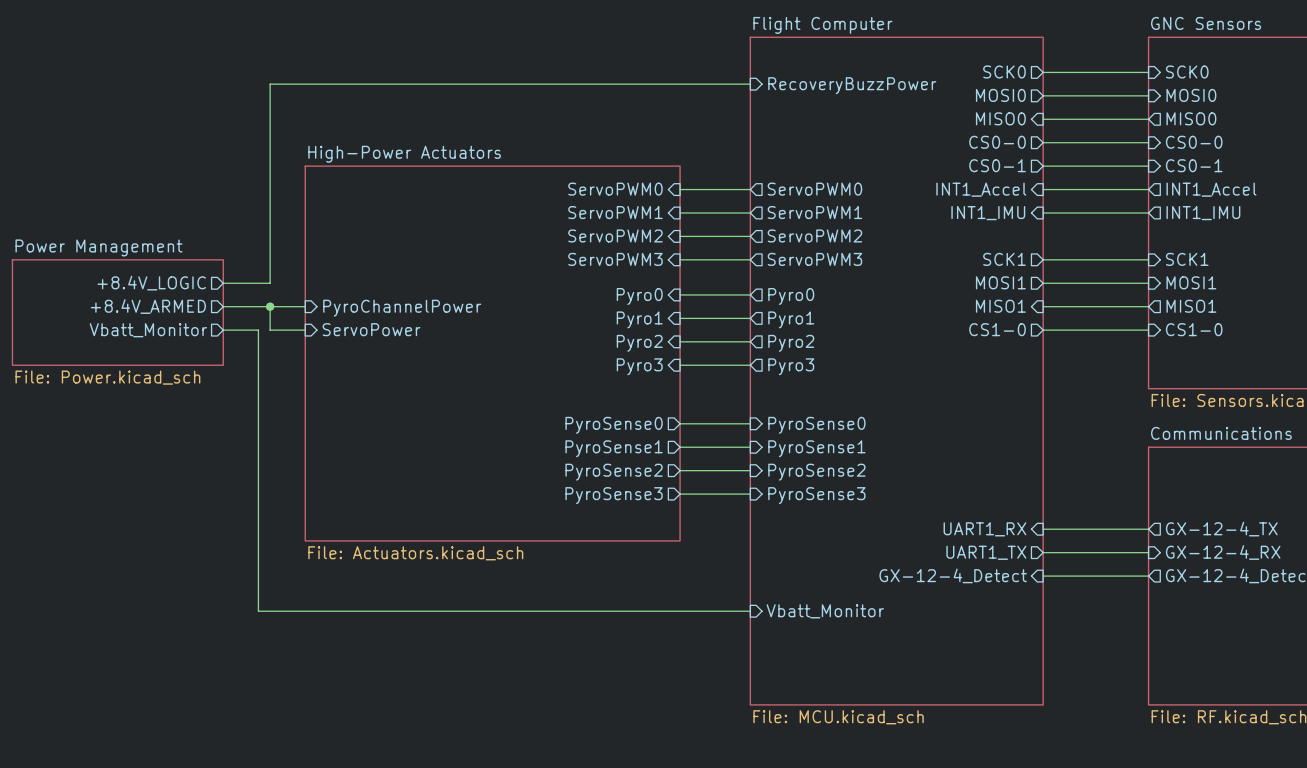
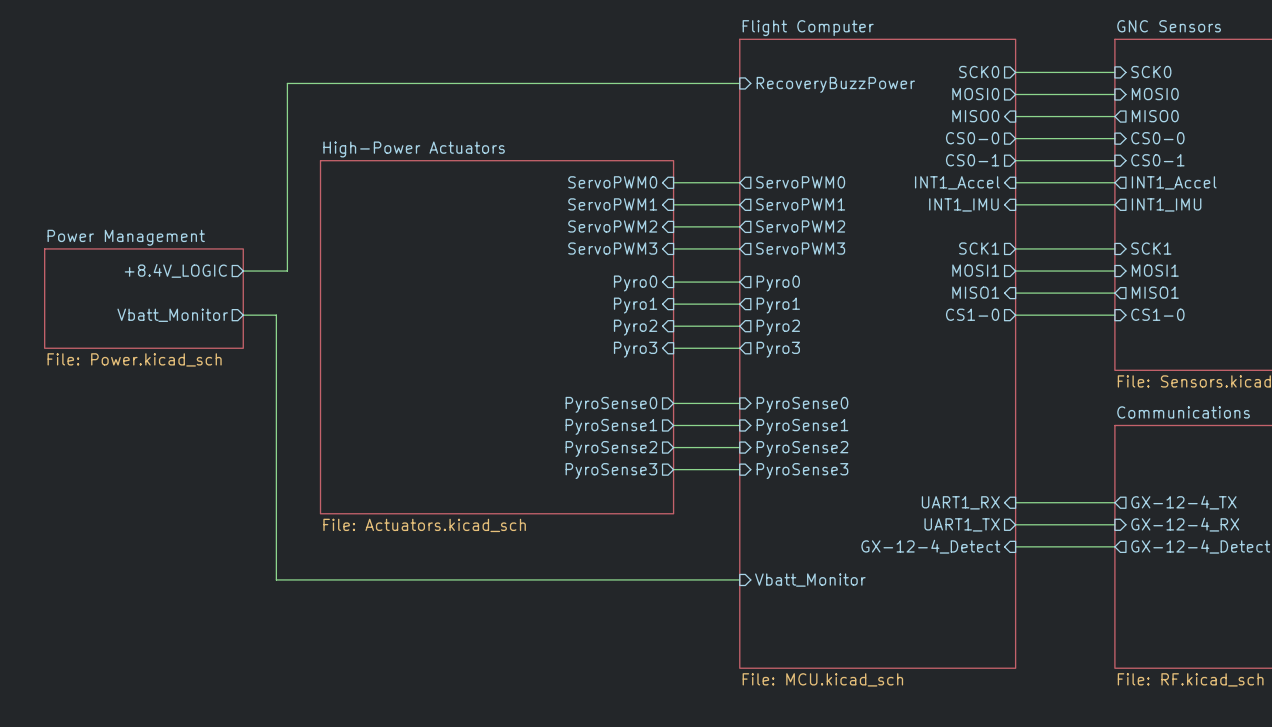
sheet pin: +8.4V_ARMED (148, 306) -> none
wire: (223, 306) (305, 306) -> none
wire: (270, 306) (270, 330) (305, 330) -> none
junction: (270, 306) -> none
sheet pin: PyroChannelPower (402, 308) -> none
sheet pin: ServoPower (371, 329) -> none

